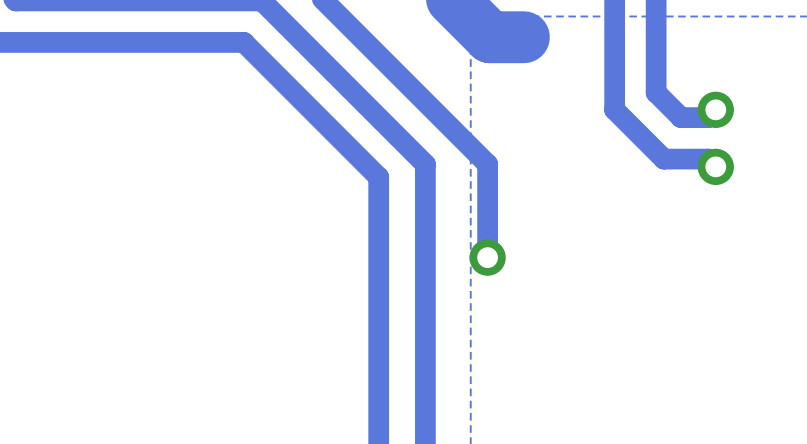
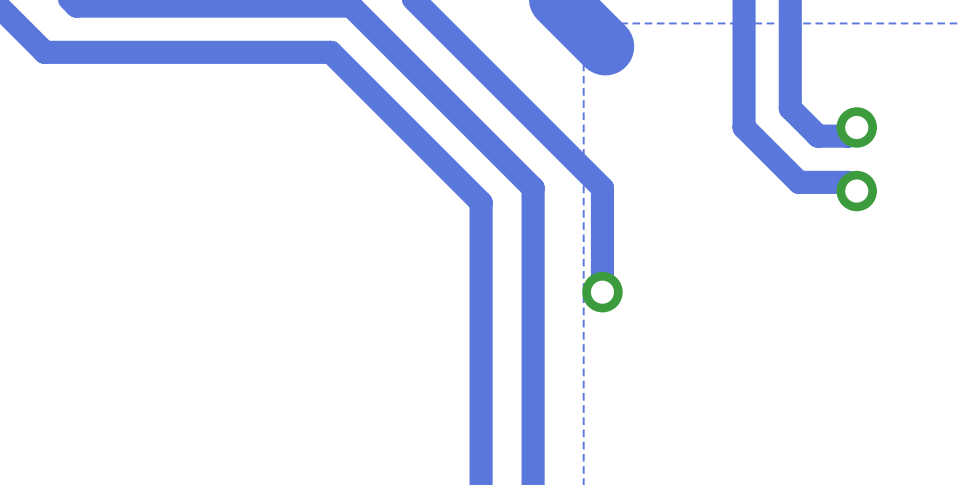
track: (523, 37) (490, 37) -> none

